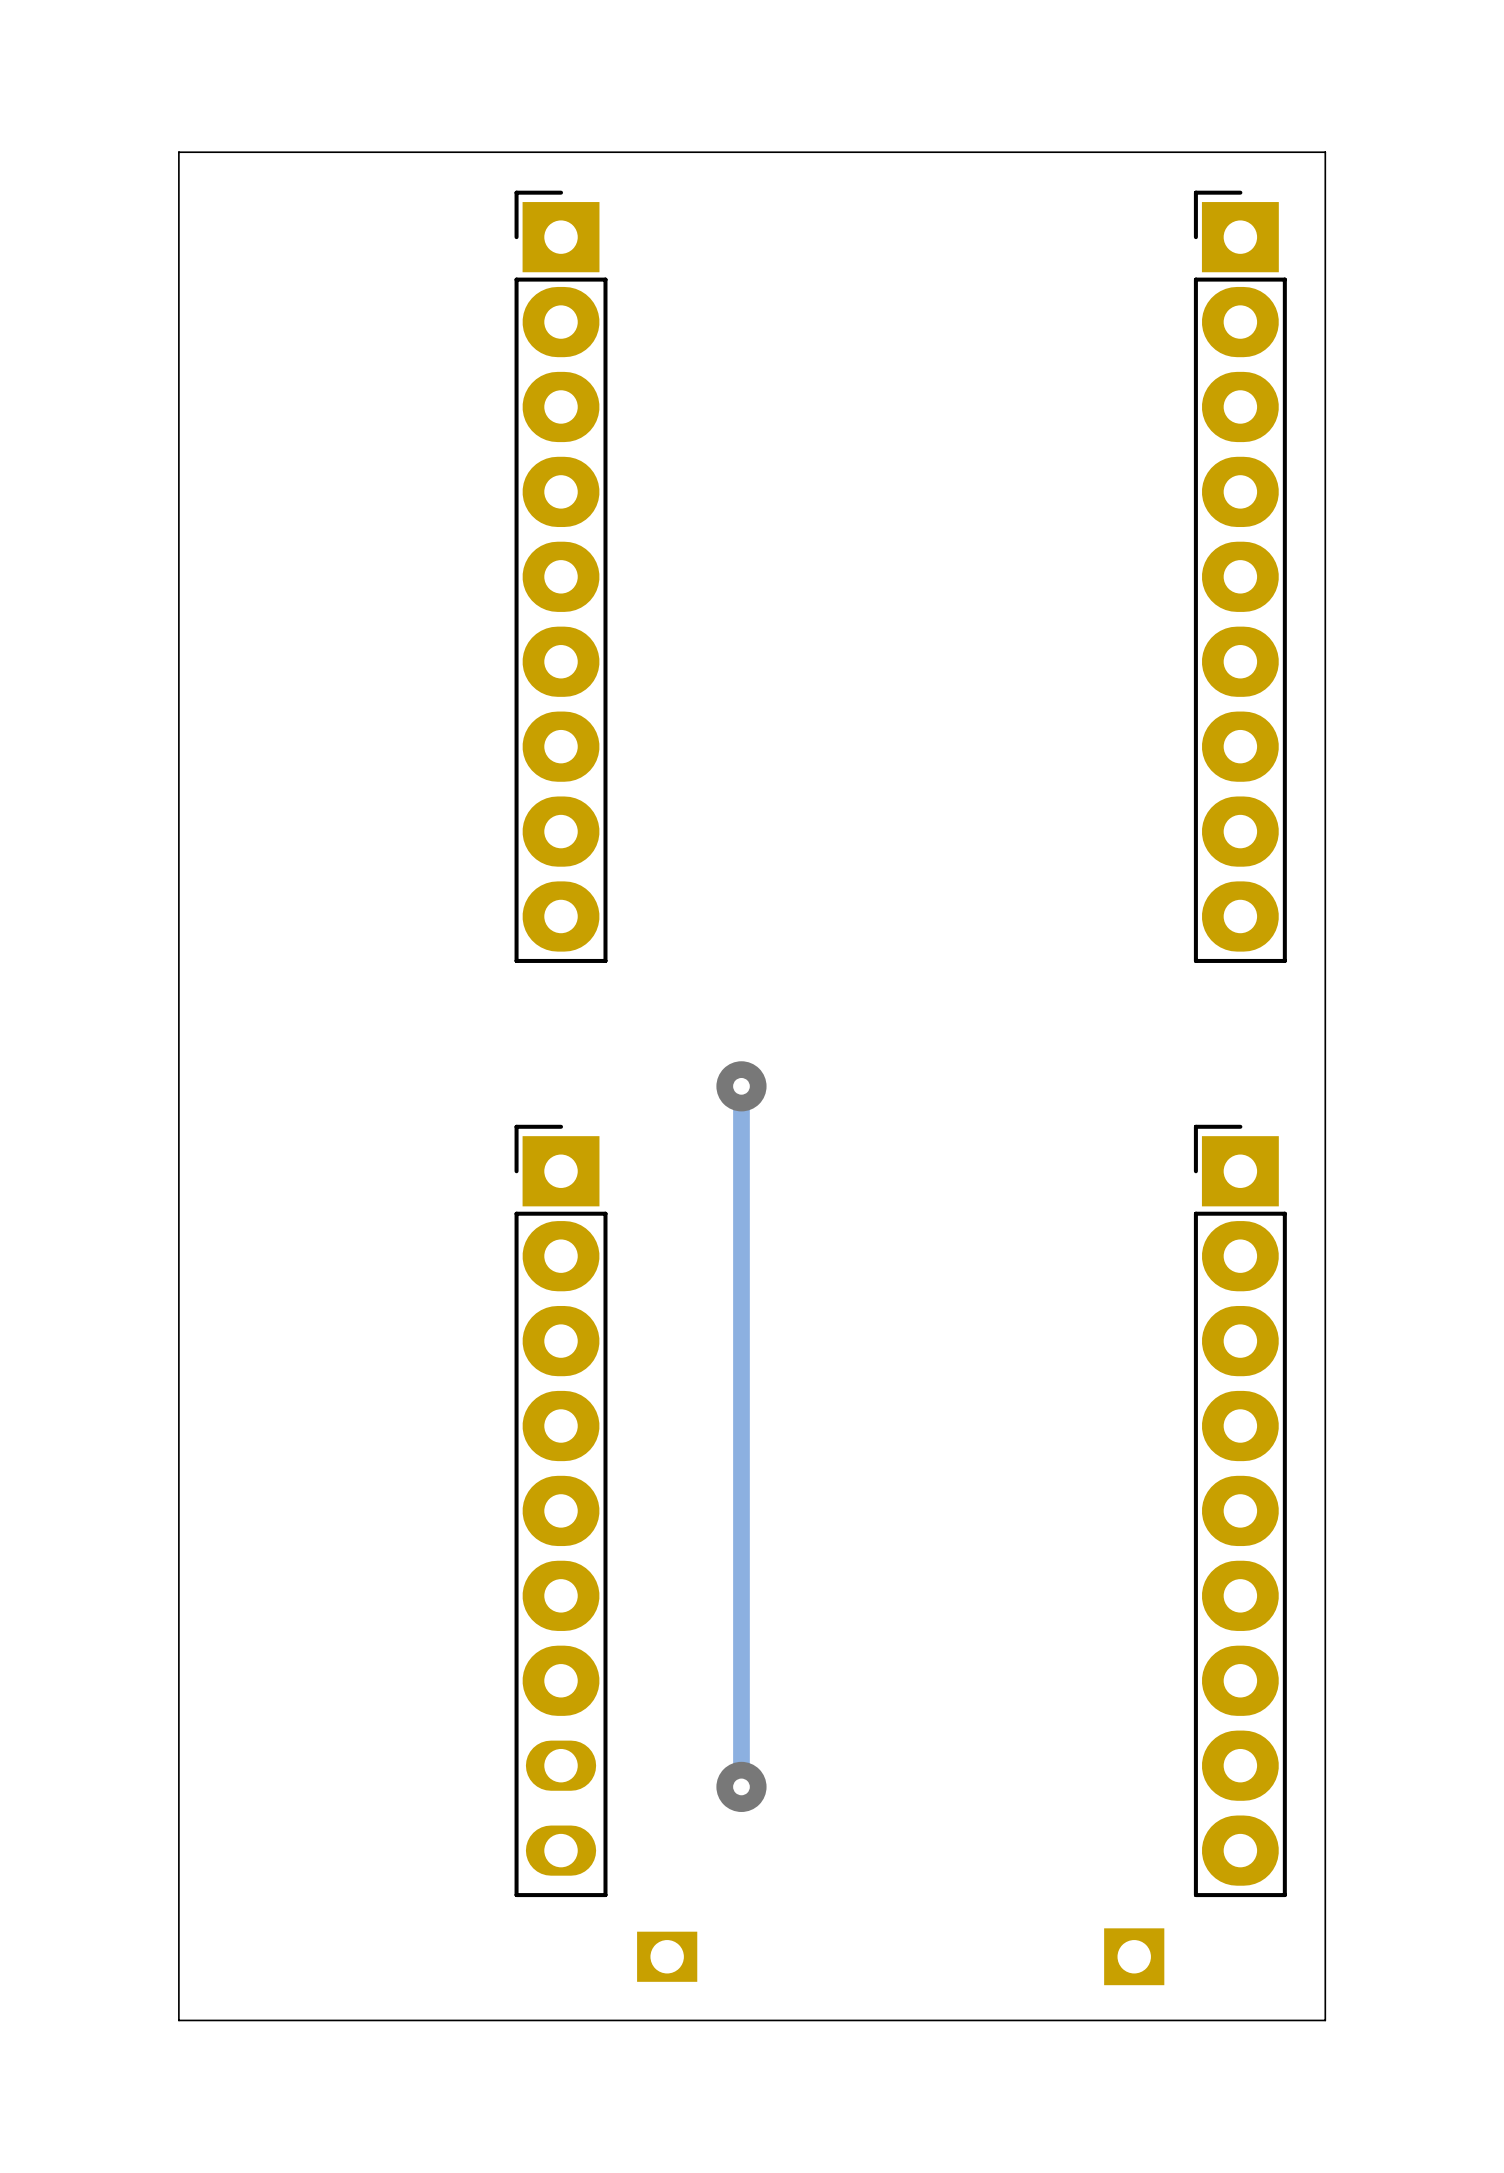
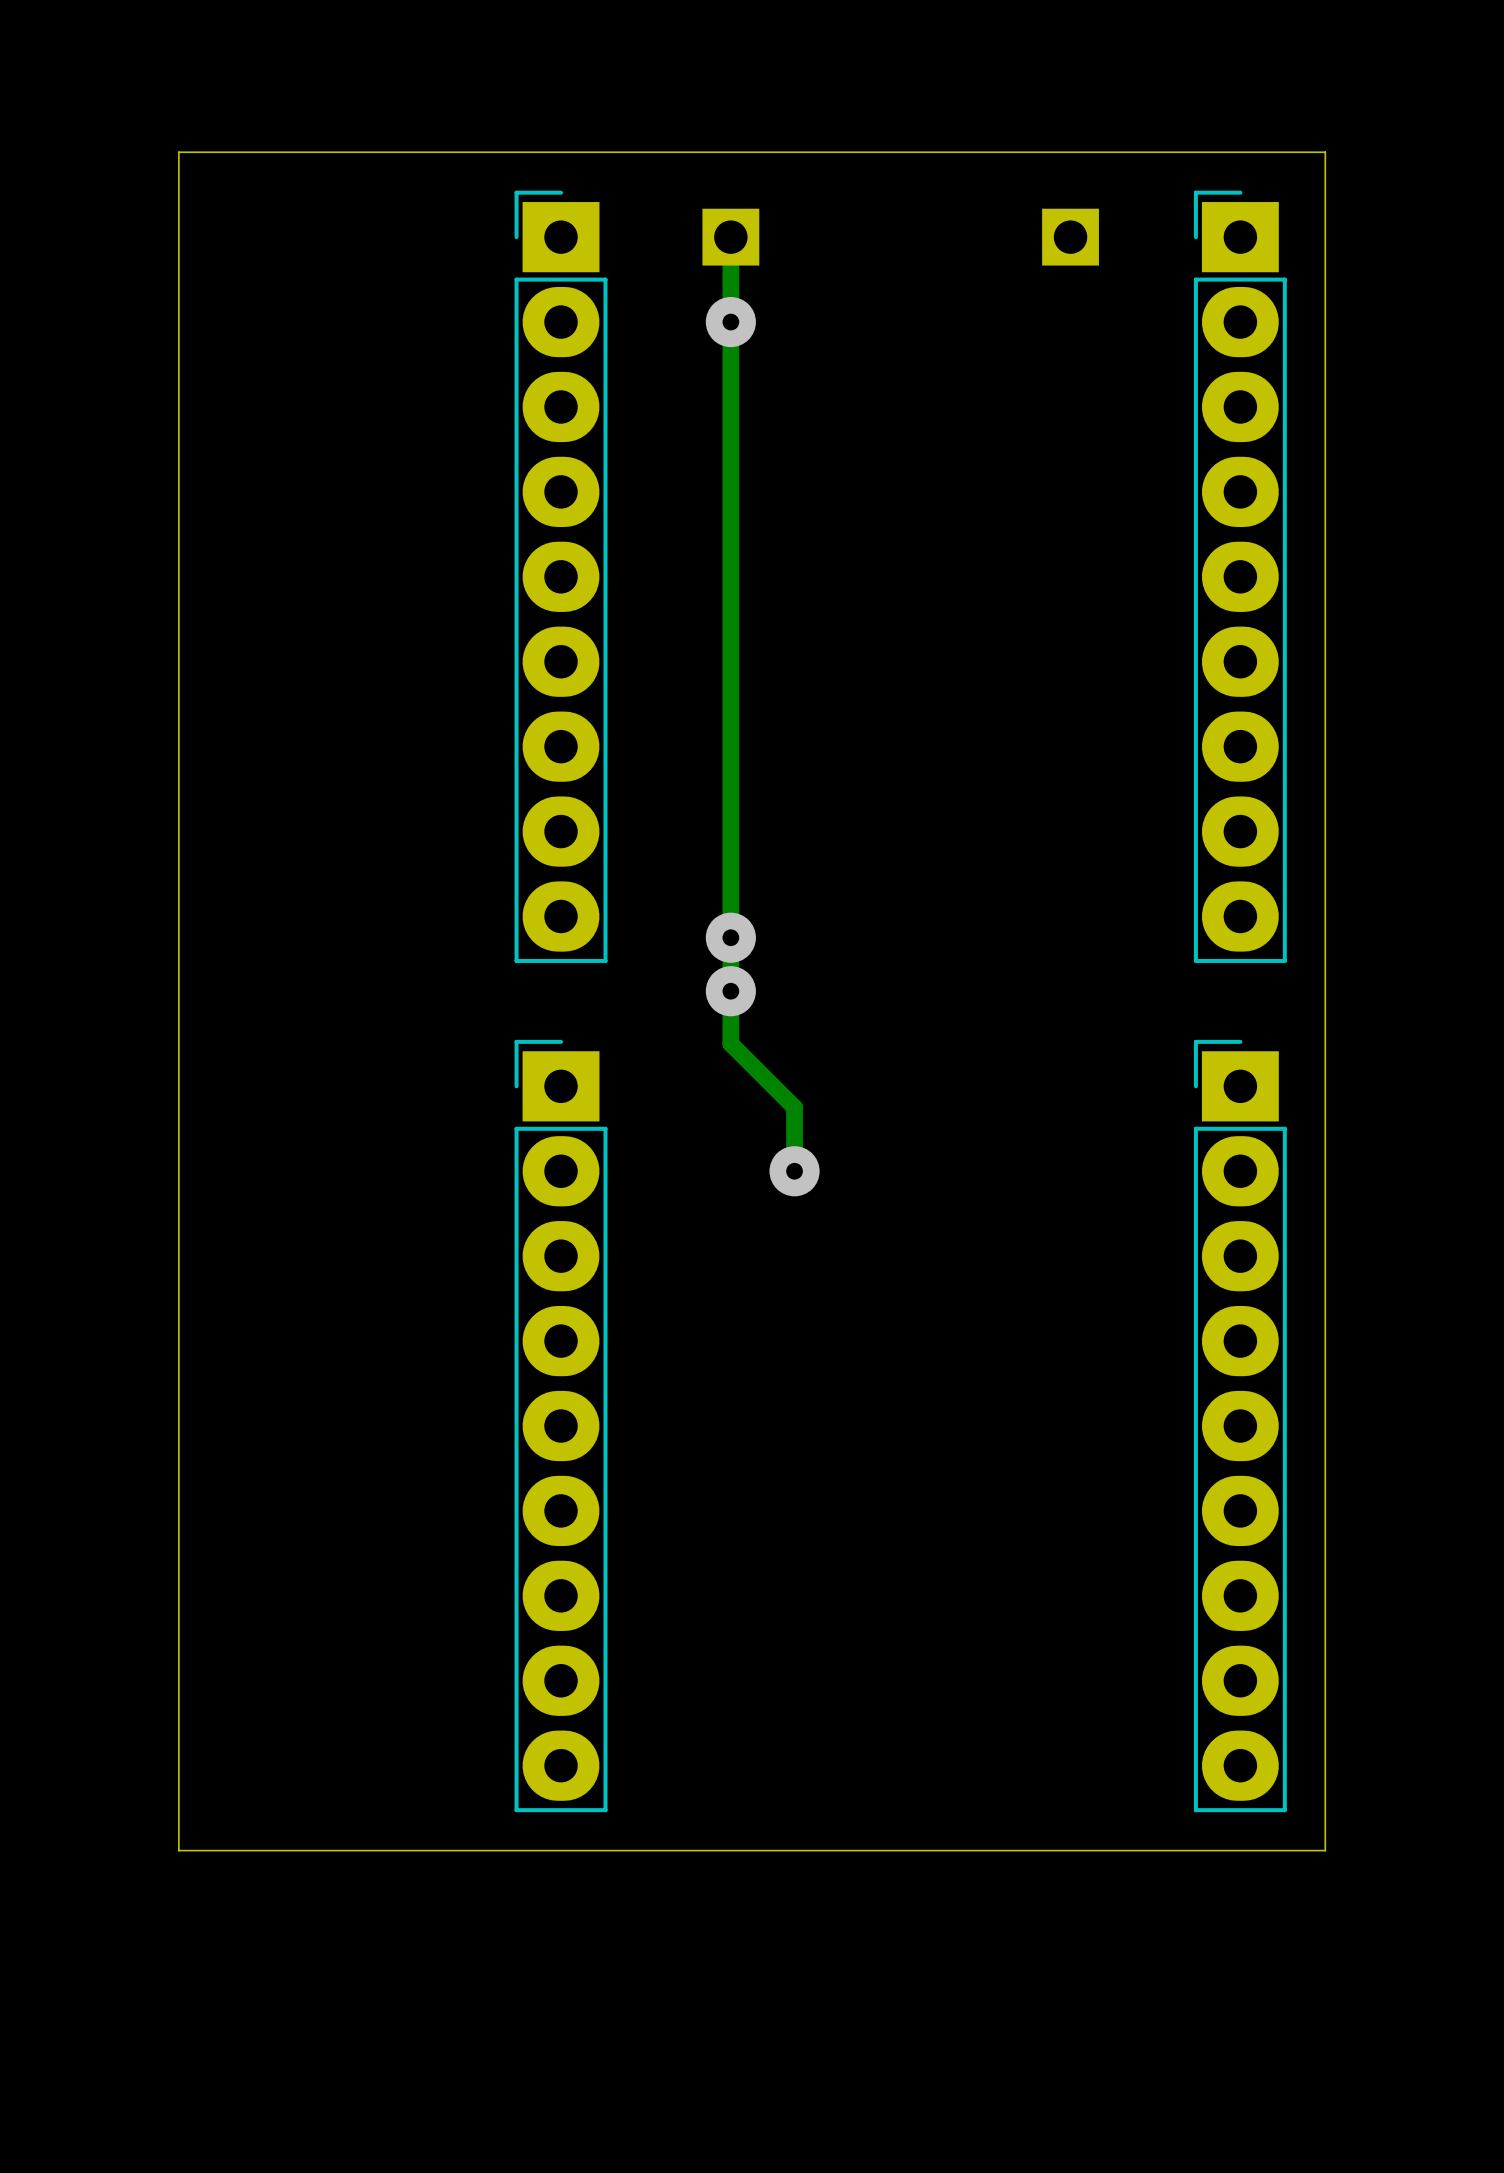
track: none -> (730, 237) (730, 1043) (794, 1107) (794, 1171)
part: none -> (730, 237)
part: none -> (1070, 237)
via: none -> (730, 322)
via: none -> (730, 937)
via: none -> (730, 991)
track: (741, 1086) (741, 1786) -> none
via: (741, 1086) -> none
via: none -> (794, 1171)
part: none -> (561, 1426)
part: (561, 1510) -> none
part position: (1240, 1510) -> (1240, 1426)
via: (741, 1786) -> none
board edge: (1325, 1850) (1325, 2020) (178, 2020) (178, 1850) -> (1325, 1850) (178, 1850)
part: (667, 1956) -> none
part: (1134, 1956) -> none

